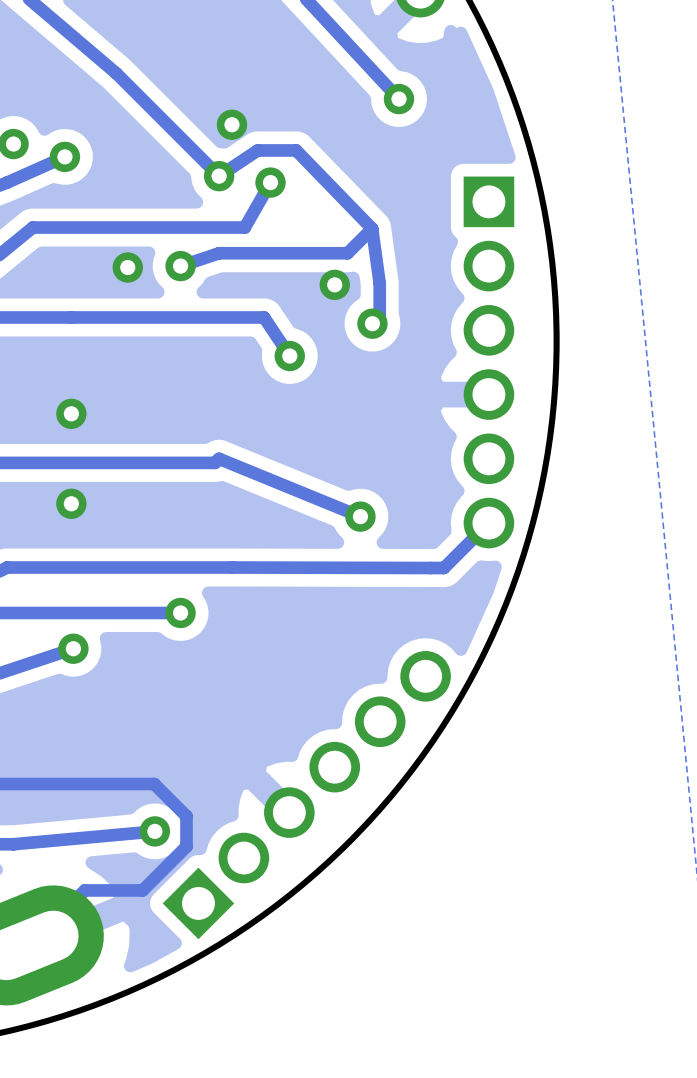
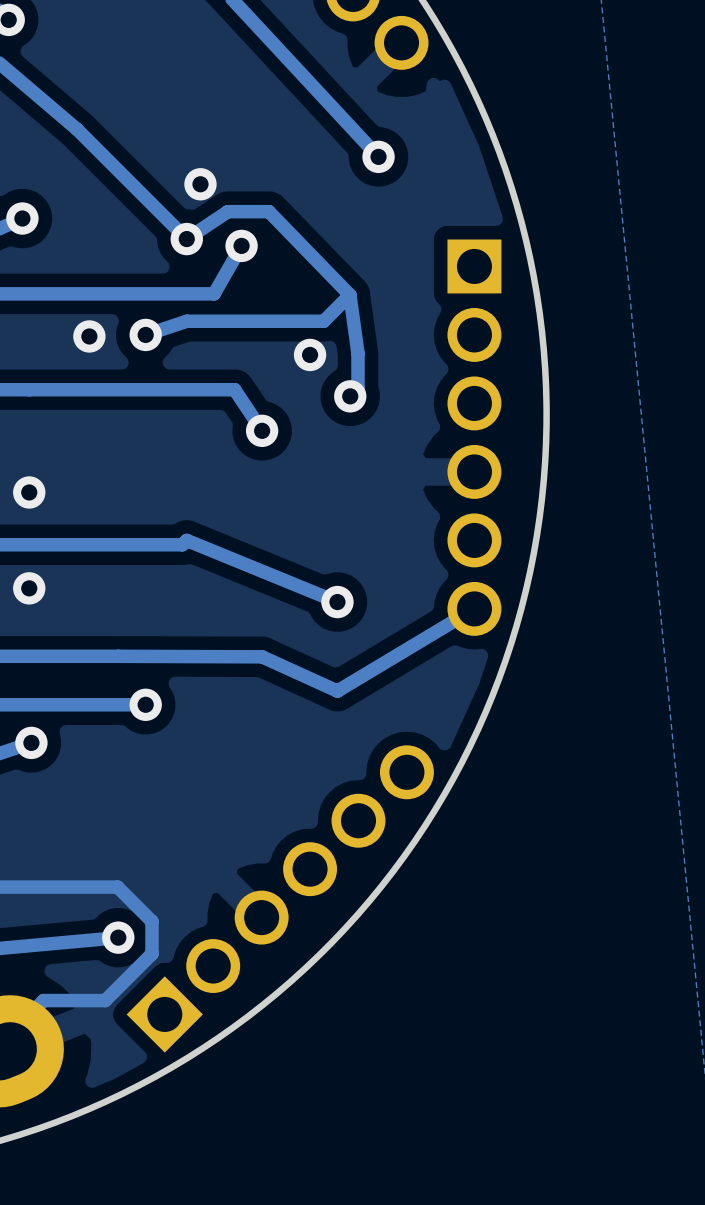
track: (488, 523) (443, 568) (154, 567) -> (474, 608) (337, 691) (262, 656) (118, 656)

